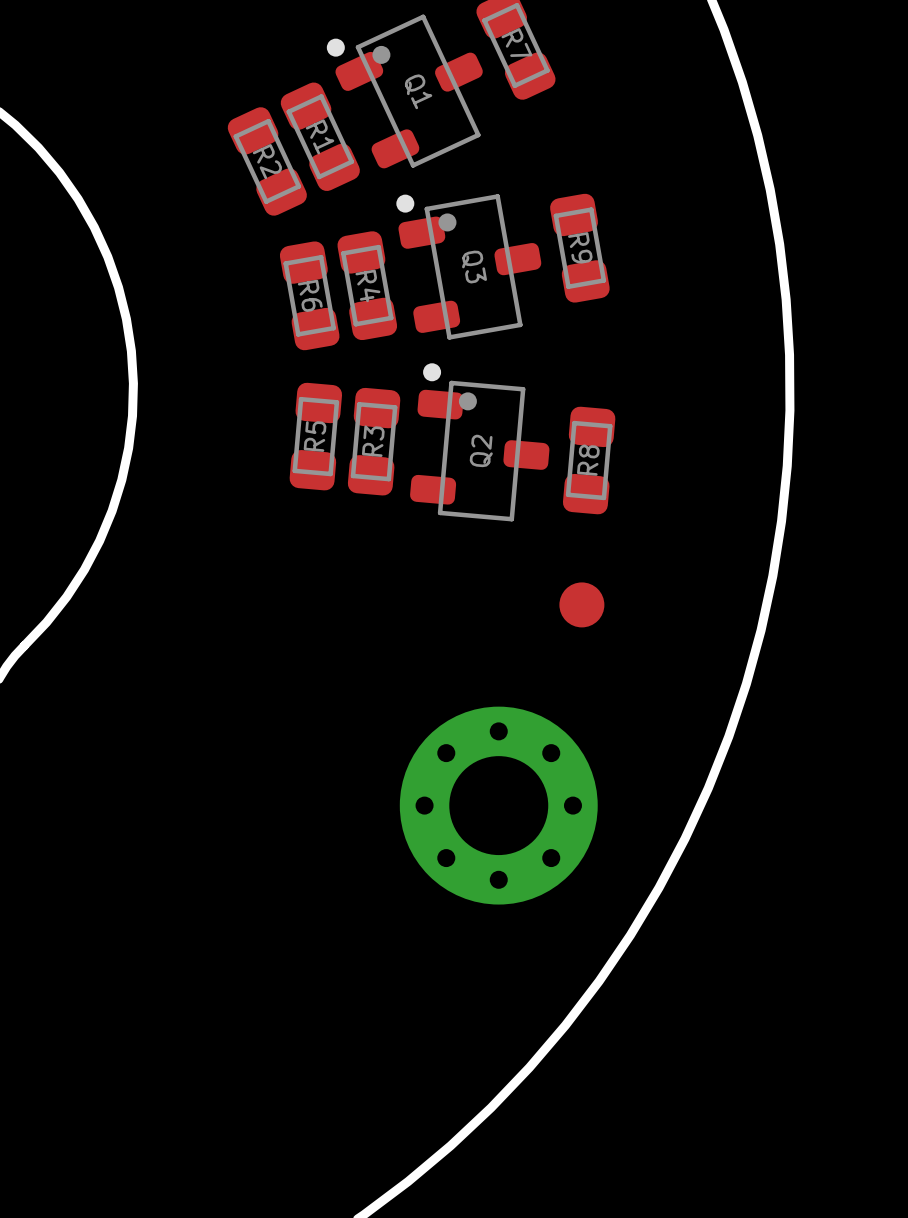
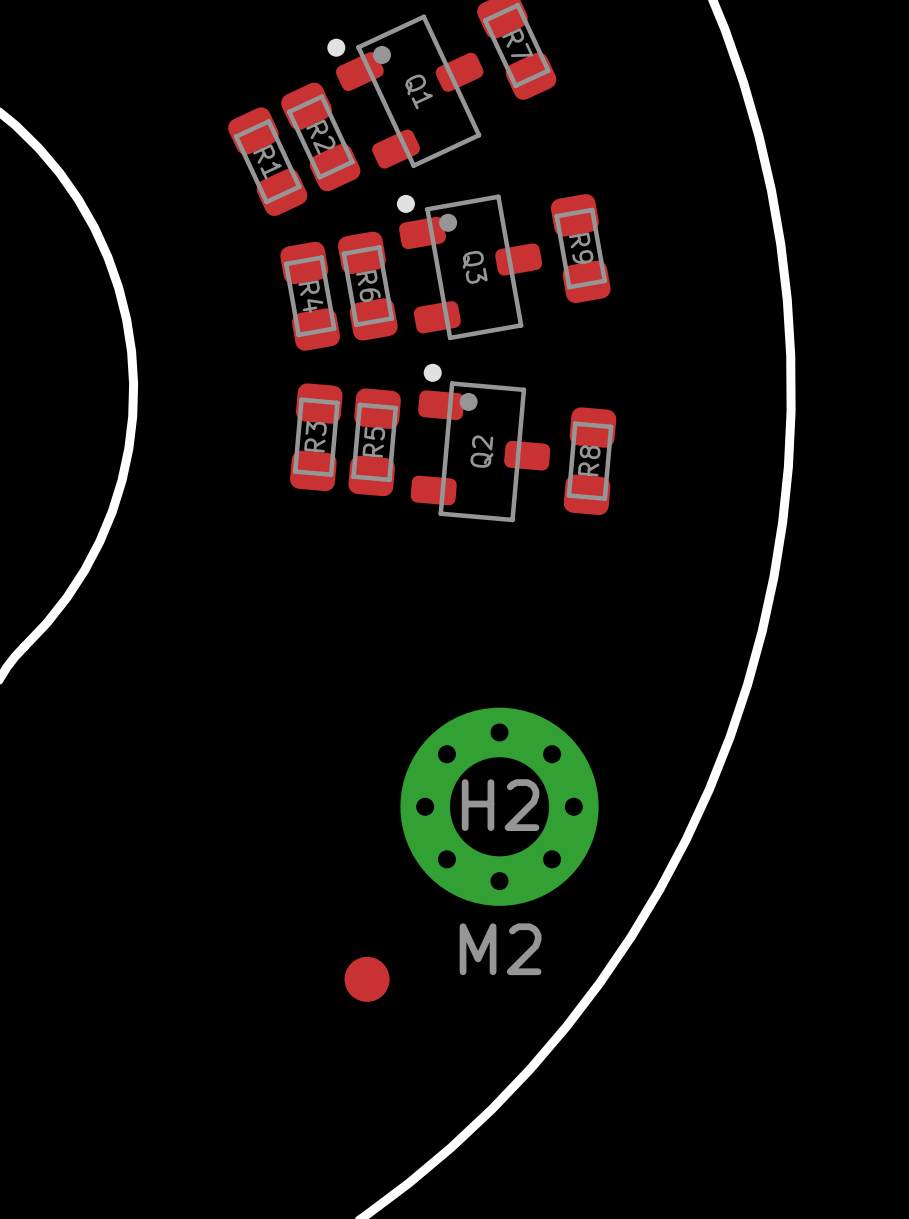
R1 name: R1 (320, 136) -> R2 (320, 137)
R2 name: R2 (267, 161) -> R1 (267, 161)
R4 name: R4 (367, 285) -> R6 (368, 286)
R6 name: R6 (310, 295) -> R4 (310, 296)
R5 name: R5 (315, 436) -> R3 (315, 436)
R3 name: R3 (373, 441) -> R5 (373, 442)
part position: (581, 604) -> (367, 979)
H2 name: none -> H2 (500, 805)
H2 value: none -> M2 (500, 949)

